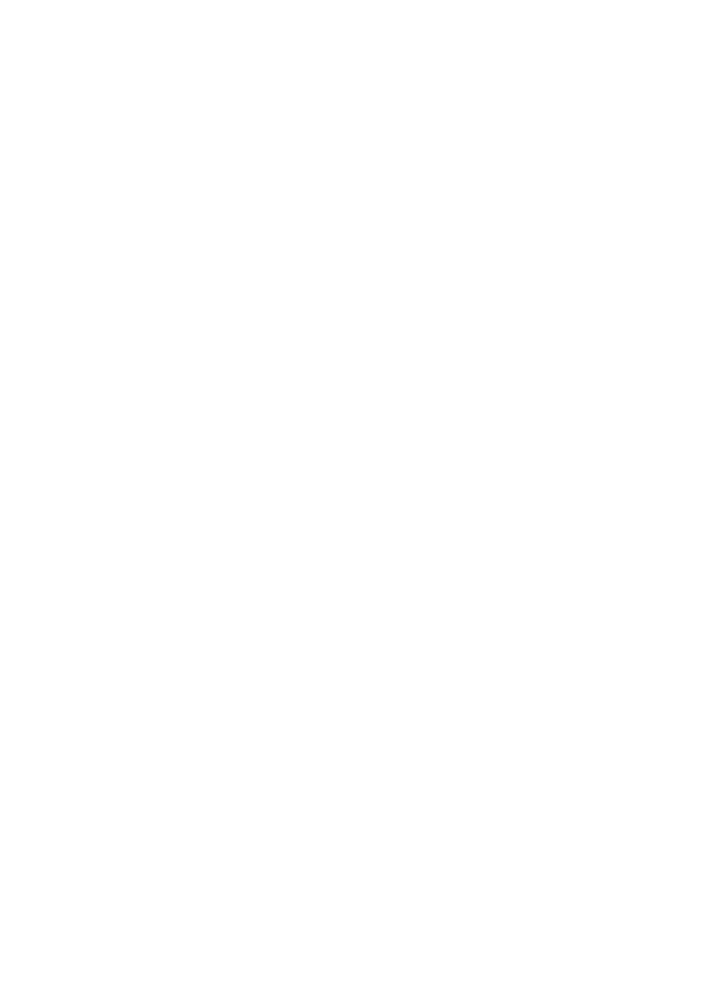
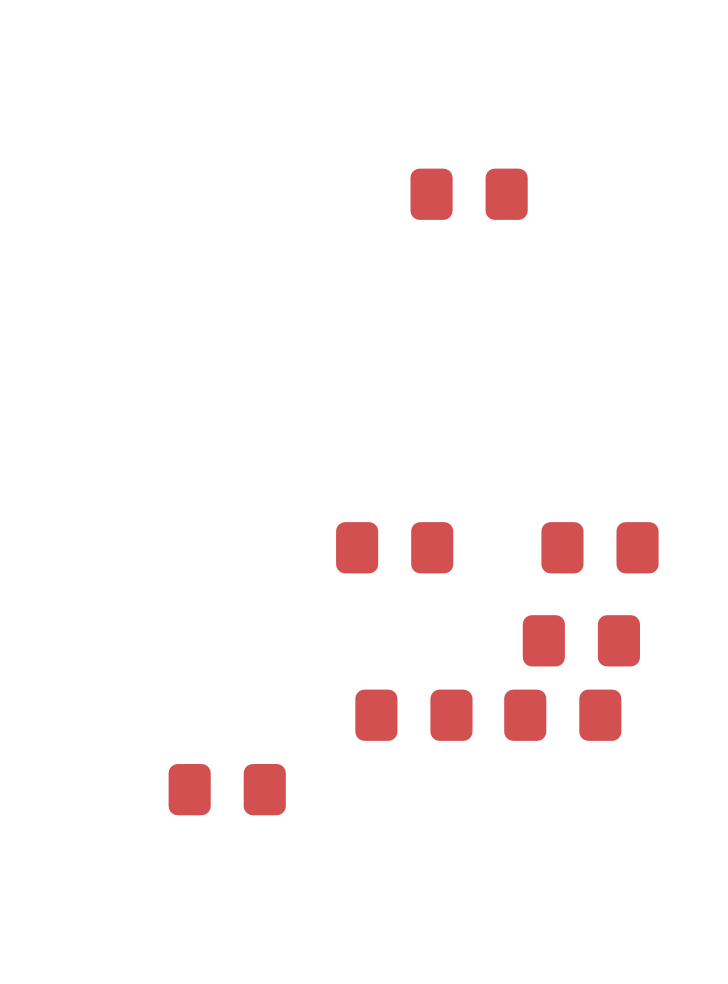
part: none -> (469, 194)
part: none -> (394, 547)
part: none -> (600, 547)
part: none -> (581, 640)
part: none -> (413, 715)
part: none -> (562, 715)
part: none -> (227, 789)

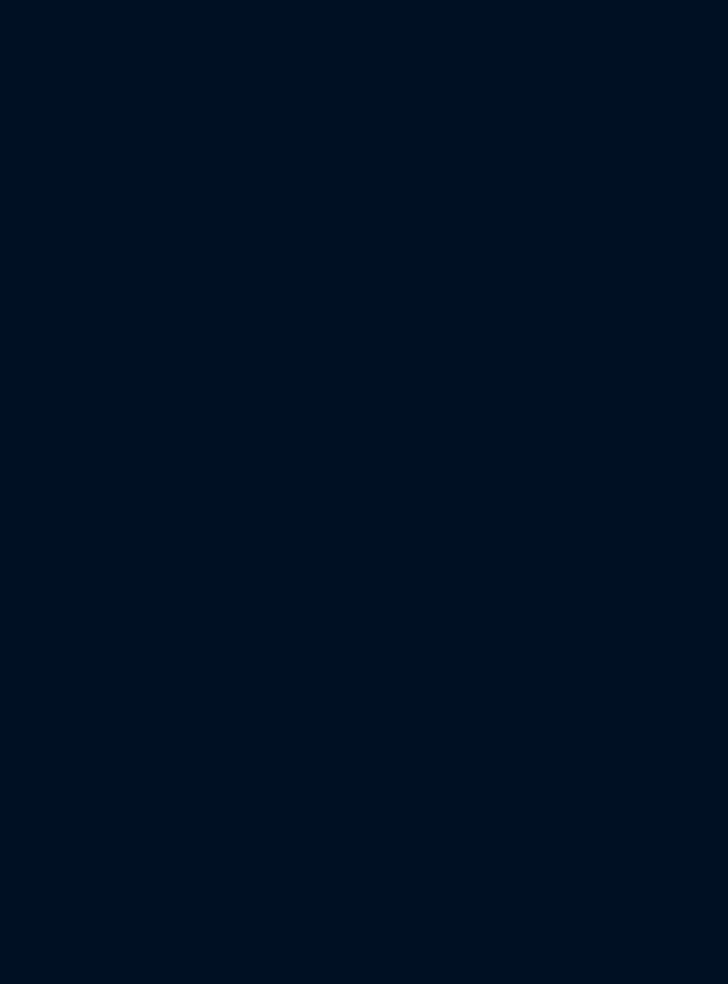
part: (469, 194) -> none
part: (394, 547) -> none
part: (600, 547) -> none
part: (581, 640) -> none
part: (413, 715) -> none
part: (562, 715) -> none
part: (227, 789) -> none

